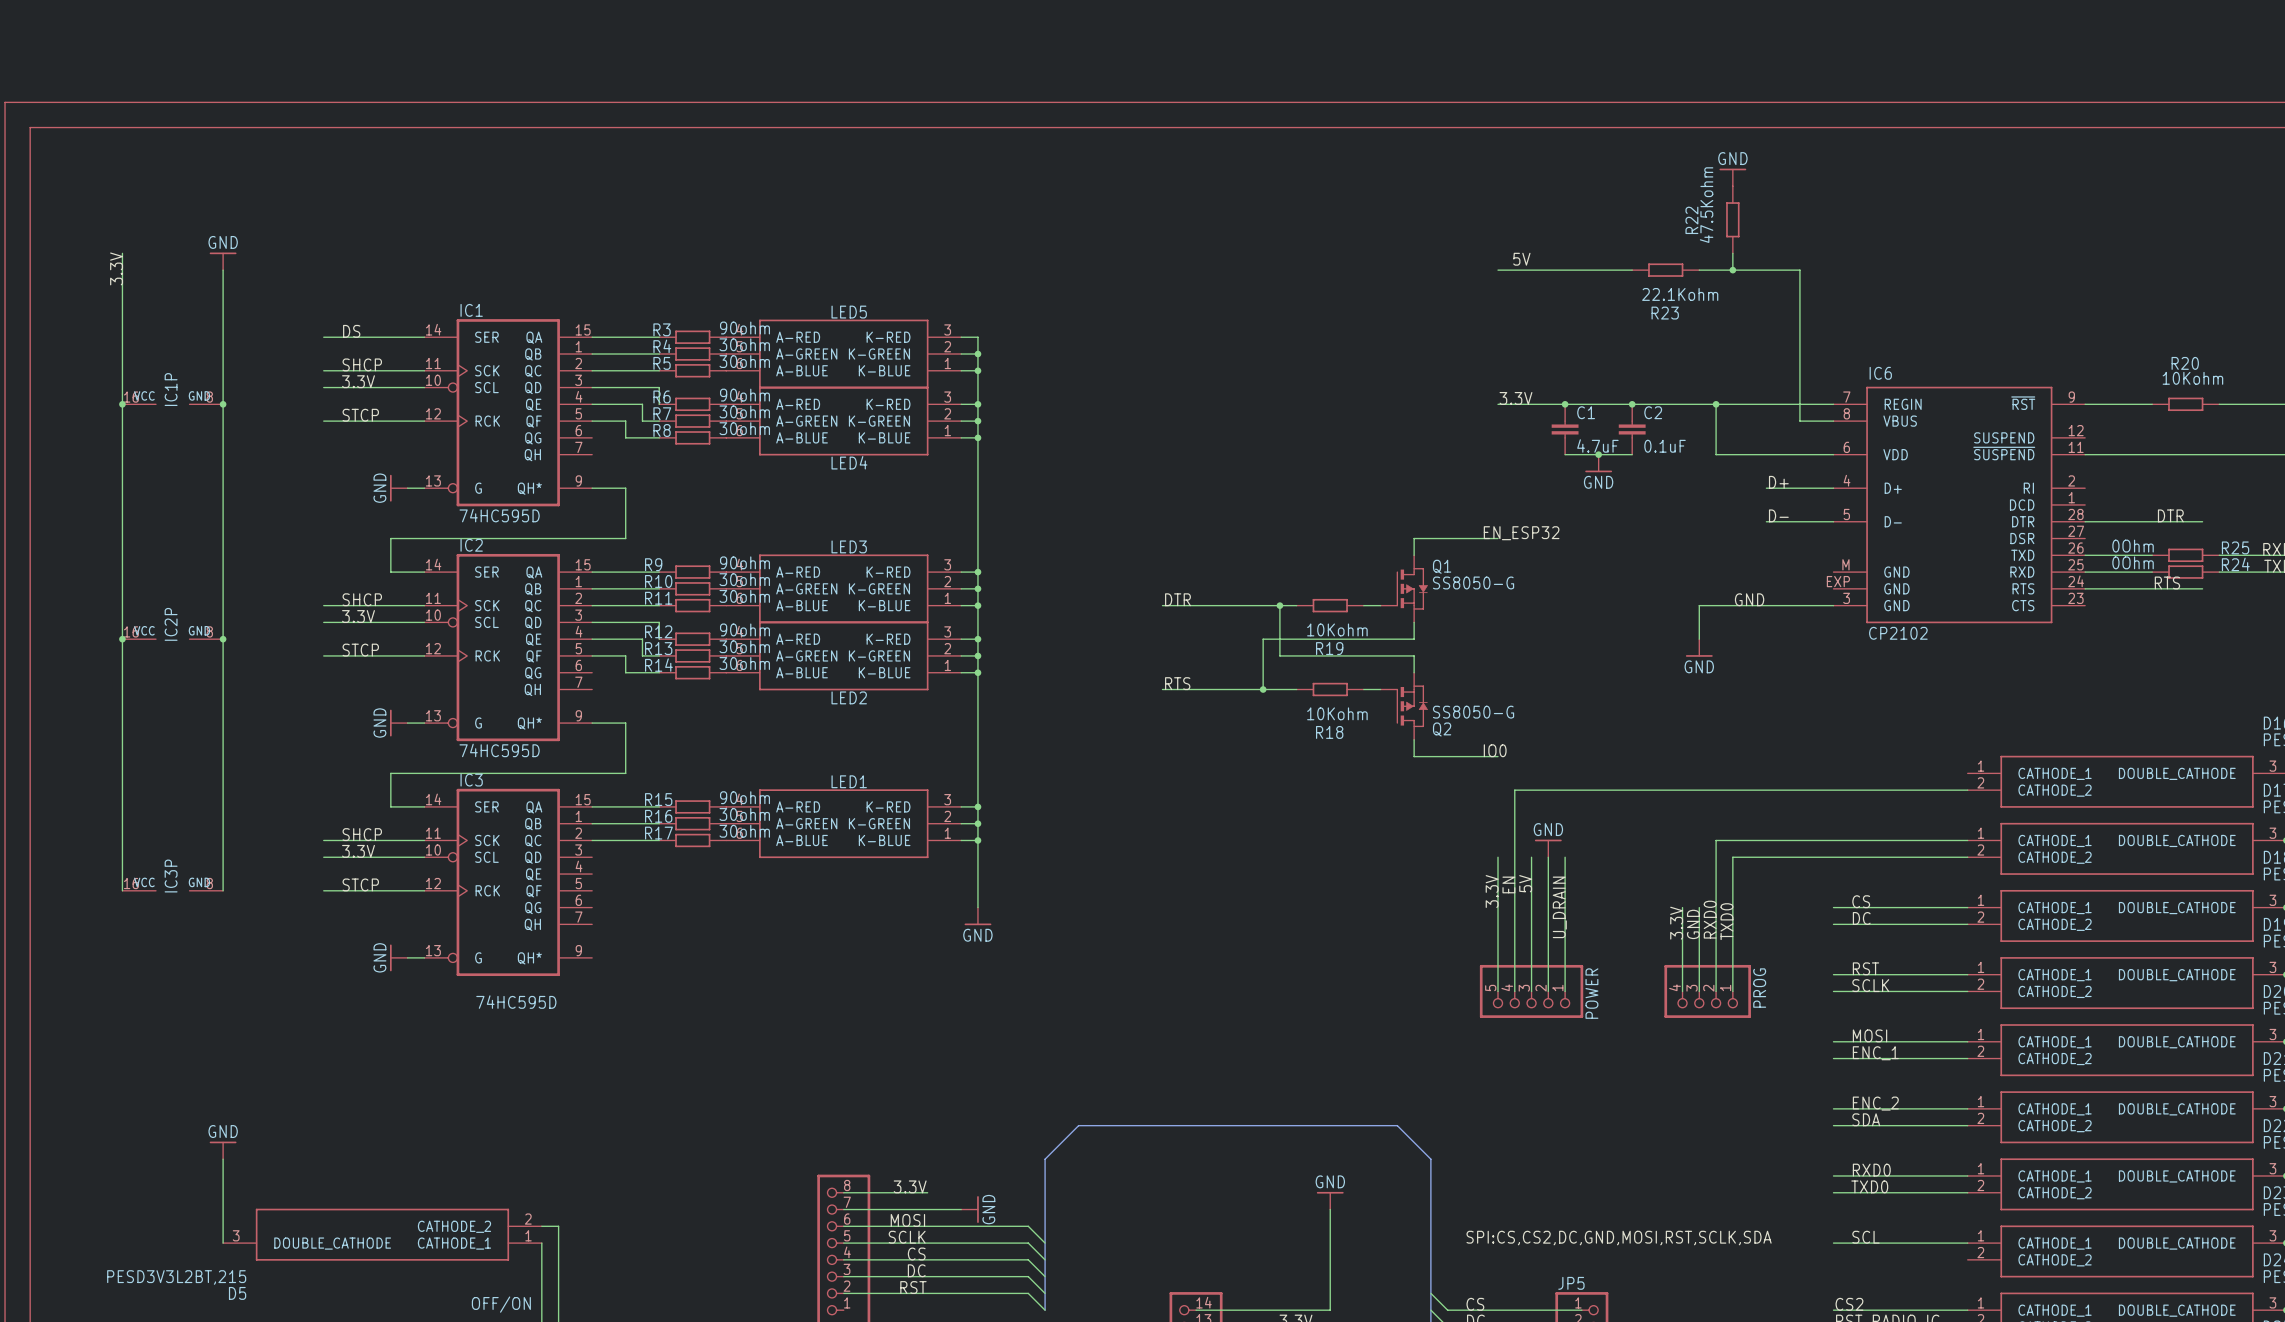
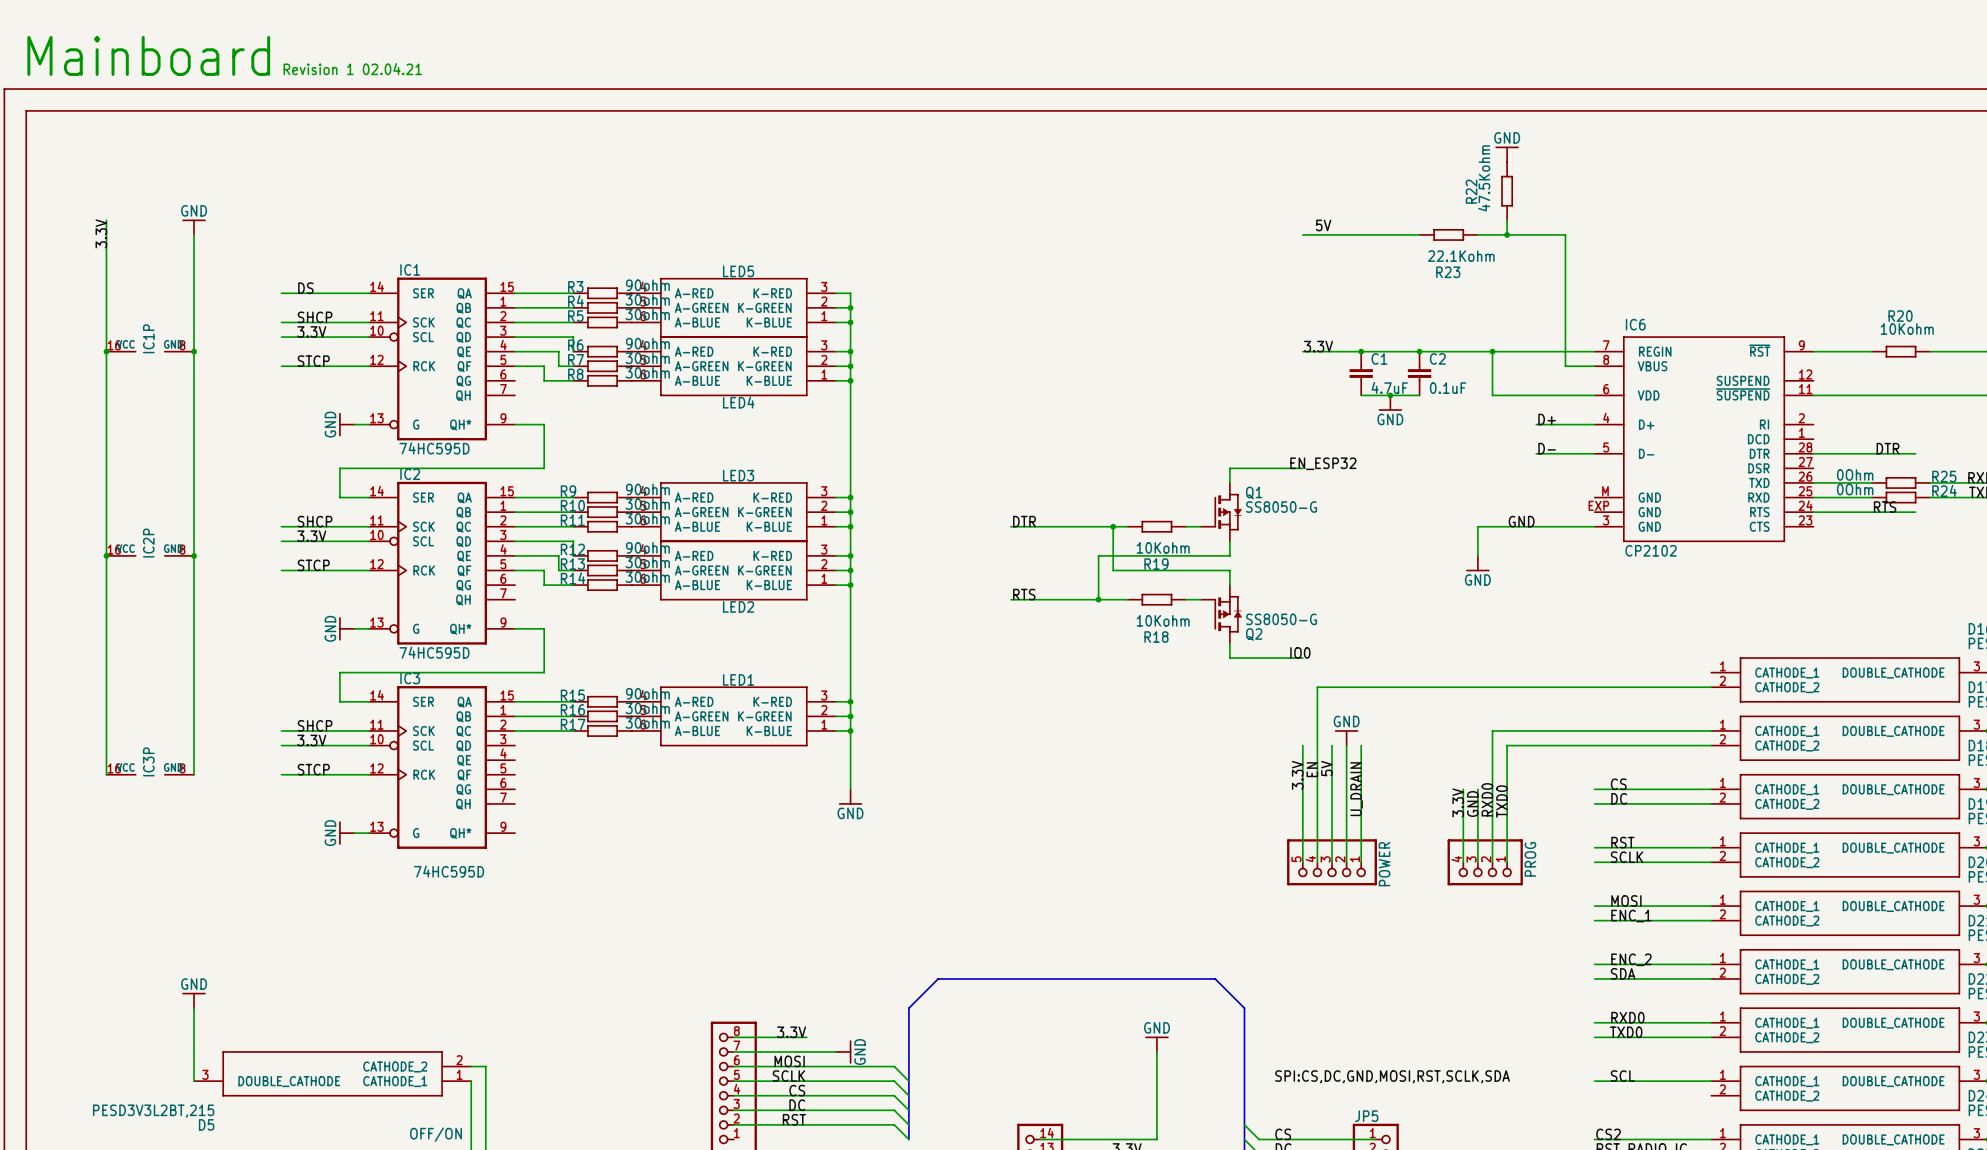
text: none -> Mainboard (148, 55)
text: none -> Revision 1 02.04.21 (352, 69)
label: SPI:CS,CS2,DC,GND,MOSI,RST,SCLK,SDA (1619, 1238) -> SPI:CS,DC,GND,MOSI,RST,SCLK,SDA (1392, 1076)

